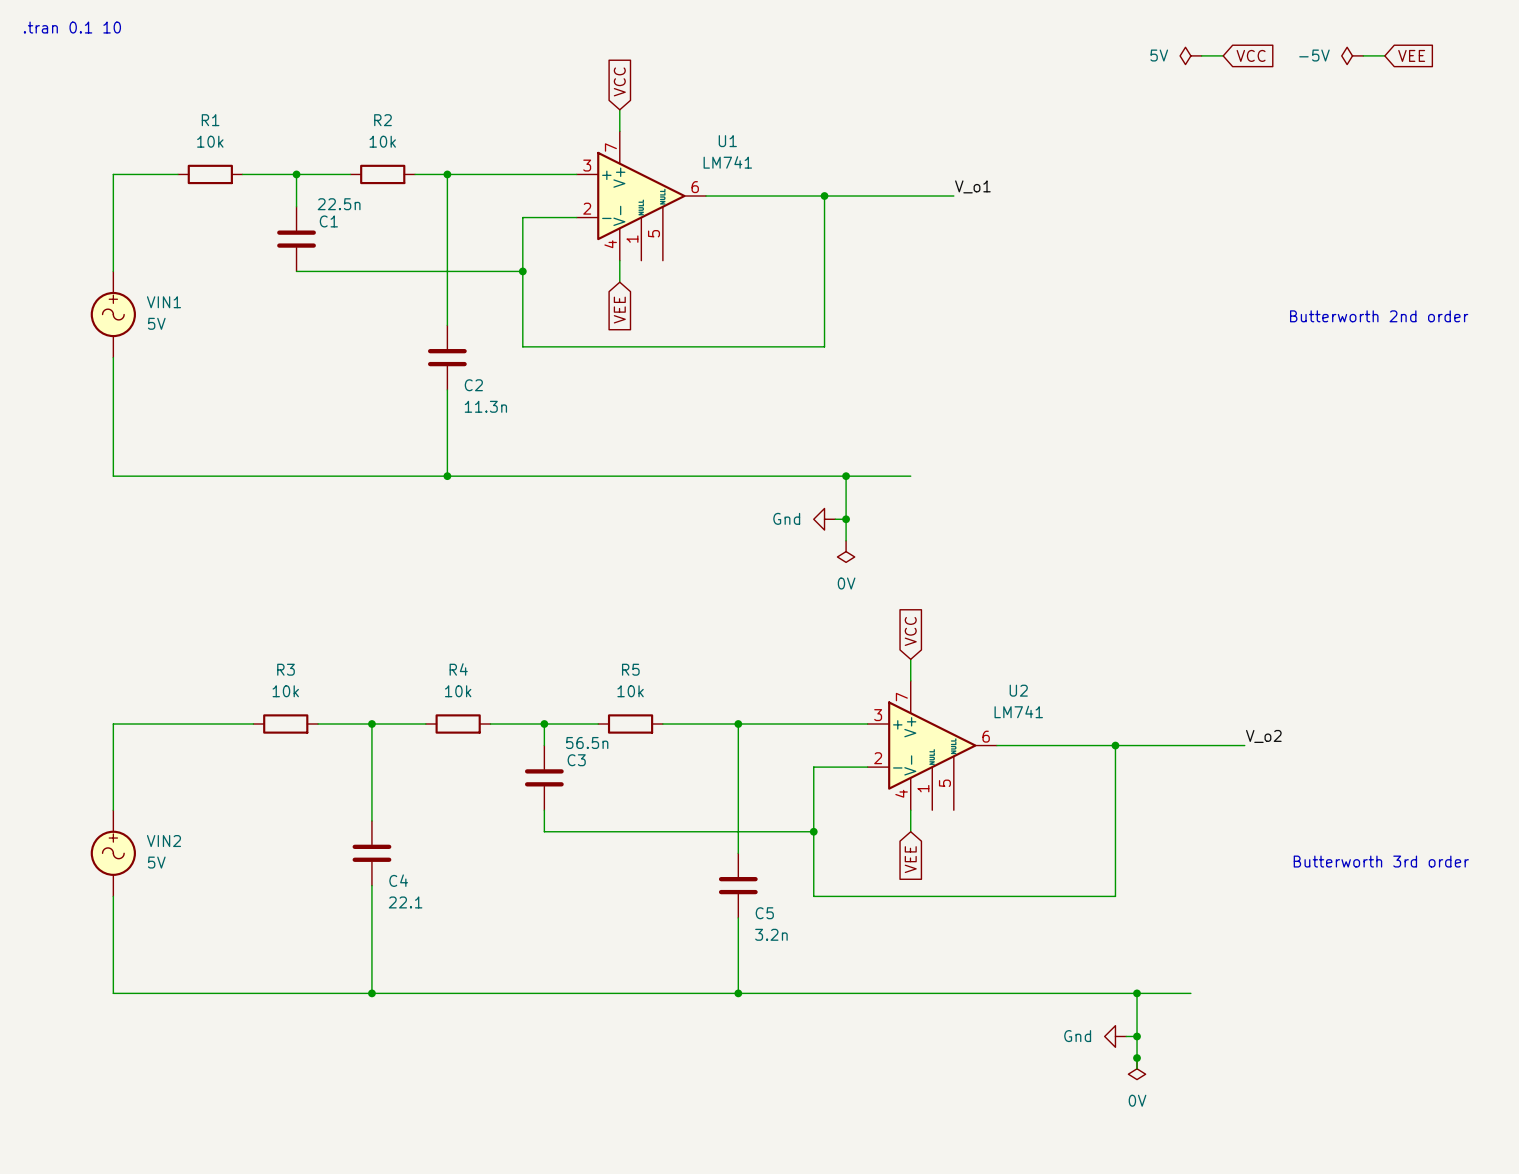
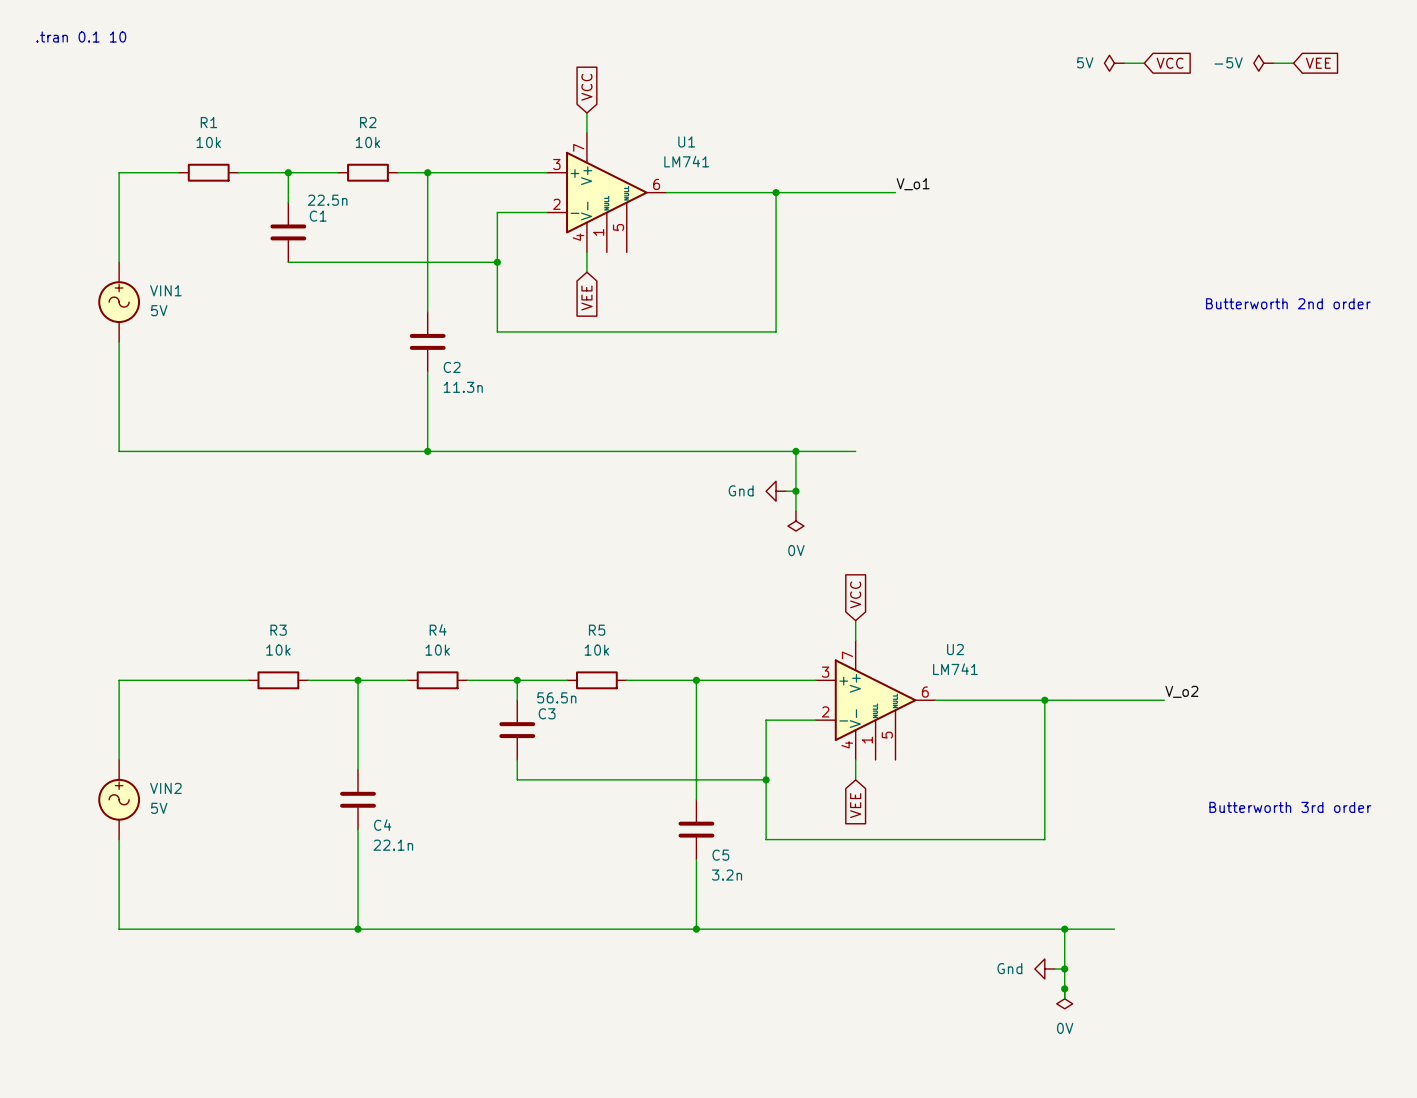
C4 value: 22.1 (405, 902) -> 22.1n (393, 845)

